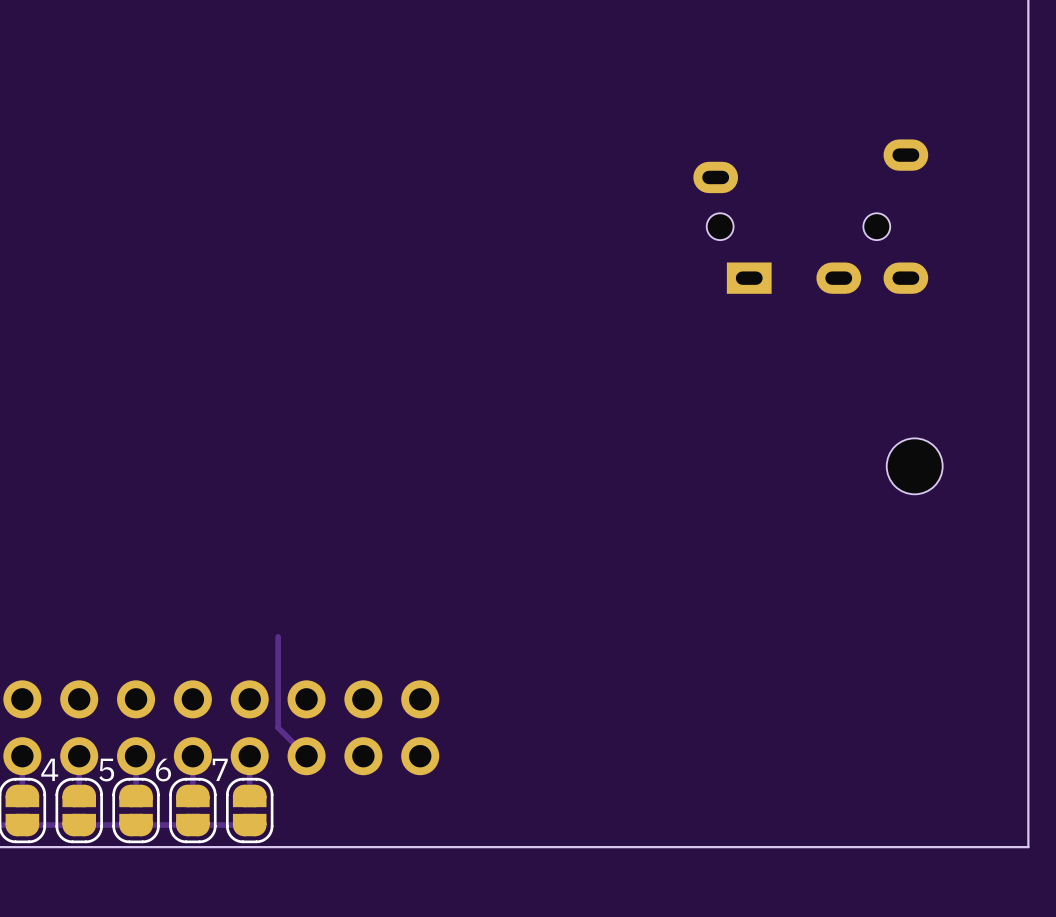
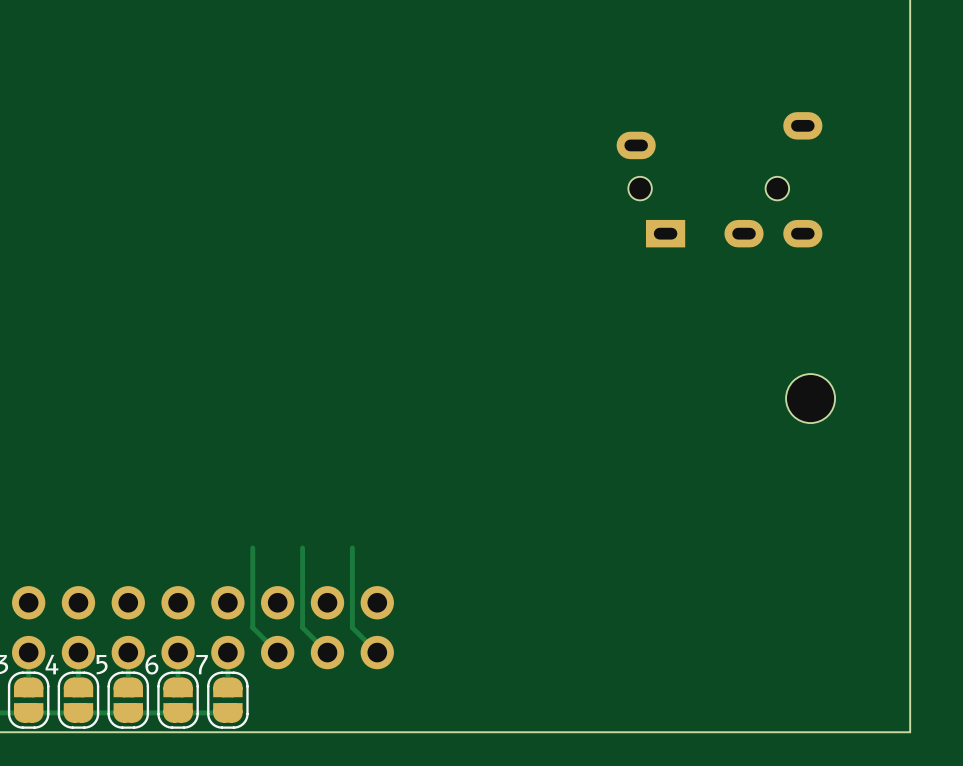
track: none -> (302, 547) (302, 627) (327, 652)
track: none -> (352, 547) (352, 627) (377, 652)

